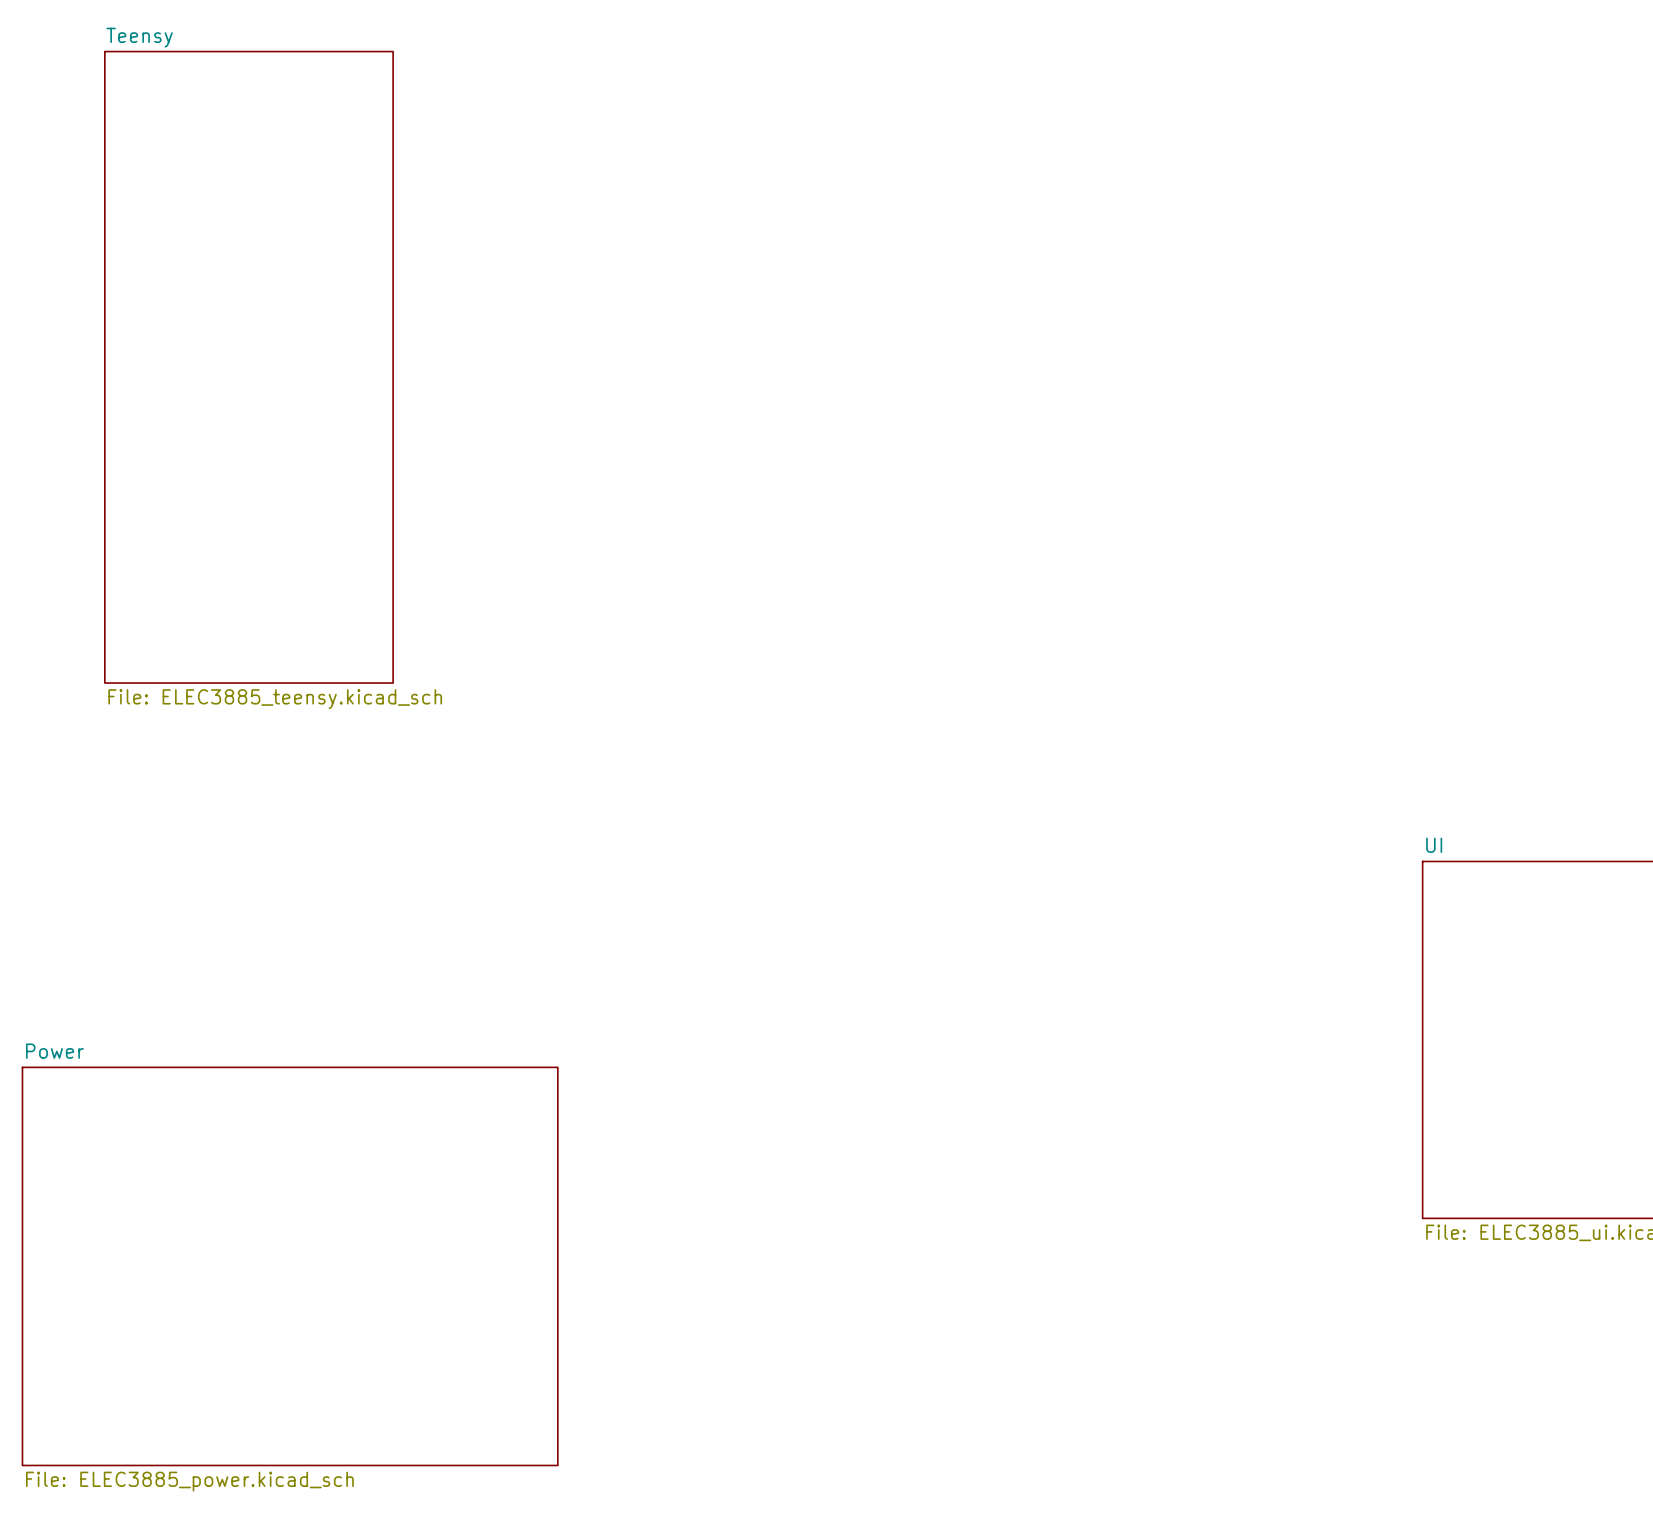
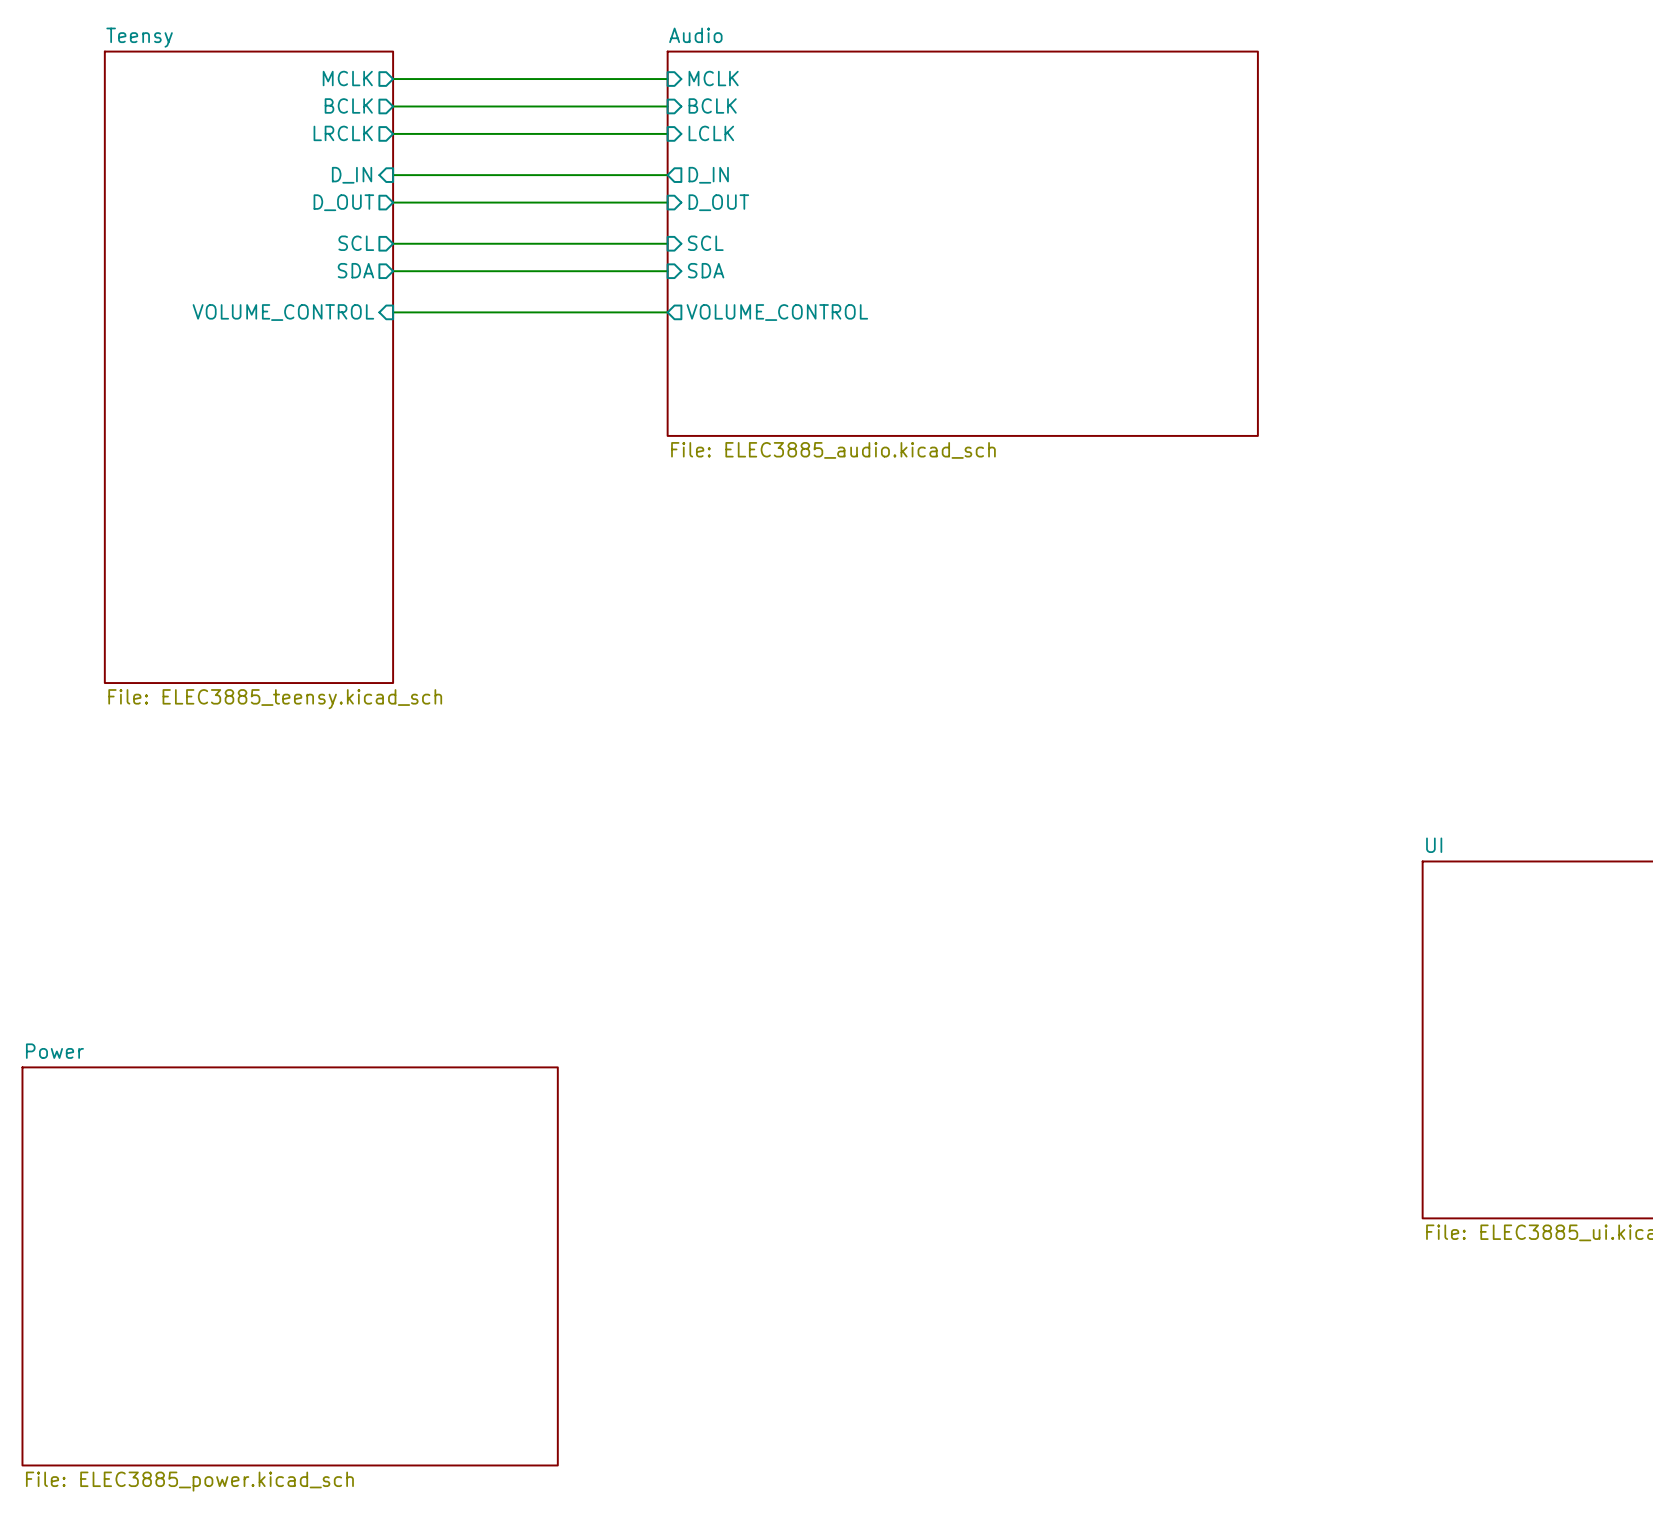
sheet pin: none -> MCLK (347, 78)
sheet pin: none -> MCLK (713, 78)
wire: none -> (393, 79) (667, 79)
sheet pin: none -> BCLK (348, 105)
sheet pin: none -> BCLK (712, 105)
wire: none -> (393, 106) (667, 106)
sheet pin: none -> LRCLK (343, 133)
wire: none -> (393, 133) (667, 133)
sheet pin: none -> LCLK (711, 133)
sheet pin: none -> D_IN (352, 175)
wire: none -> (393, 175) (667, 175)
sheet pin: none -> D_IN (708, 175)
sheet pin: none -> D_OUT (343, 202)
wire: none -> (393, 202) (667, 202)
sheet pin: none -> D_OUT (718, 202)
sheet pin: none -> SCL (356, 243)
wire: none -> (393, 243) (667, 243)
sheet pin: none -> SCL (705, 243)
sheet Audio: none -> File: ELEC3885_audio.kicad_sch (962, 243)
sheet pin: none -> SDA (355, 270)
sheet pin: none -> SDA (706, 270)
wire: none -> (393, 271) (667, 271)
sheet pin: none -> VOLUME_CONTROL (283, 312)
wire: none -> (393, 312) (667, 312)
sheet pin: none -> VOLUME_CONTROL (777, 312)

